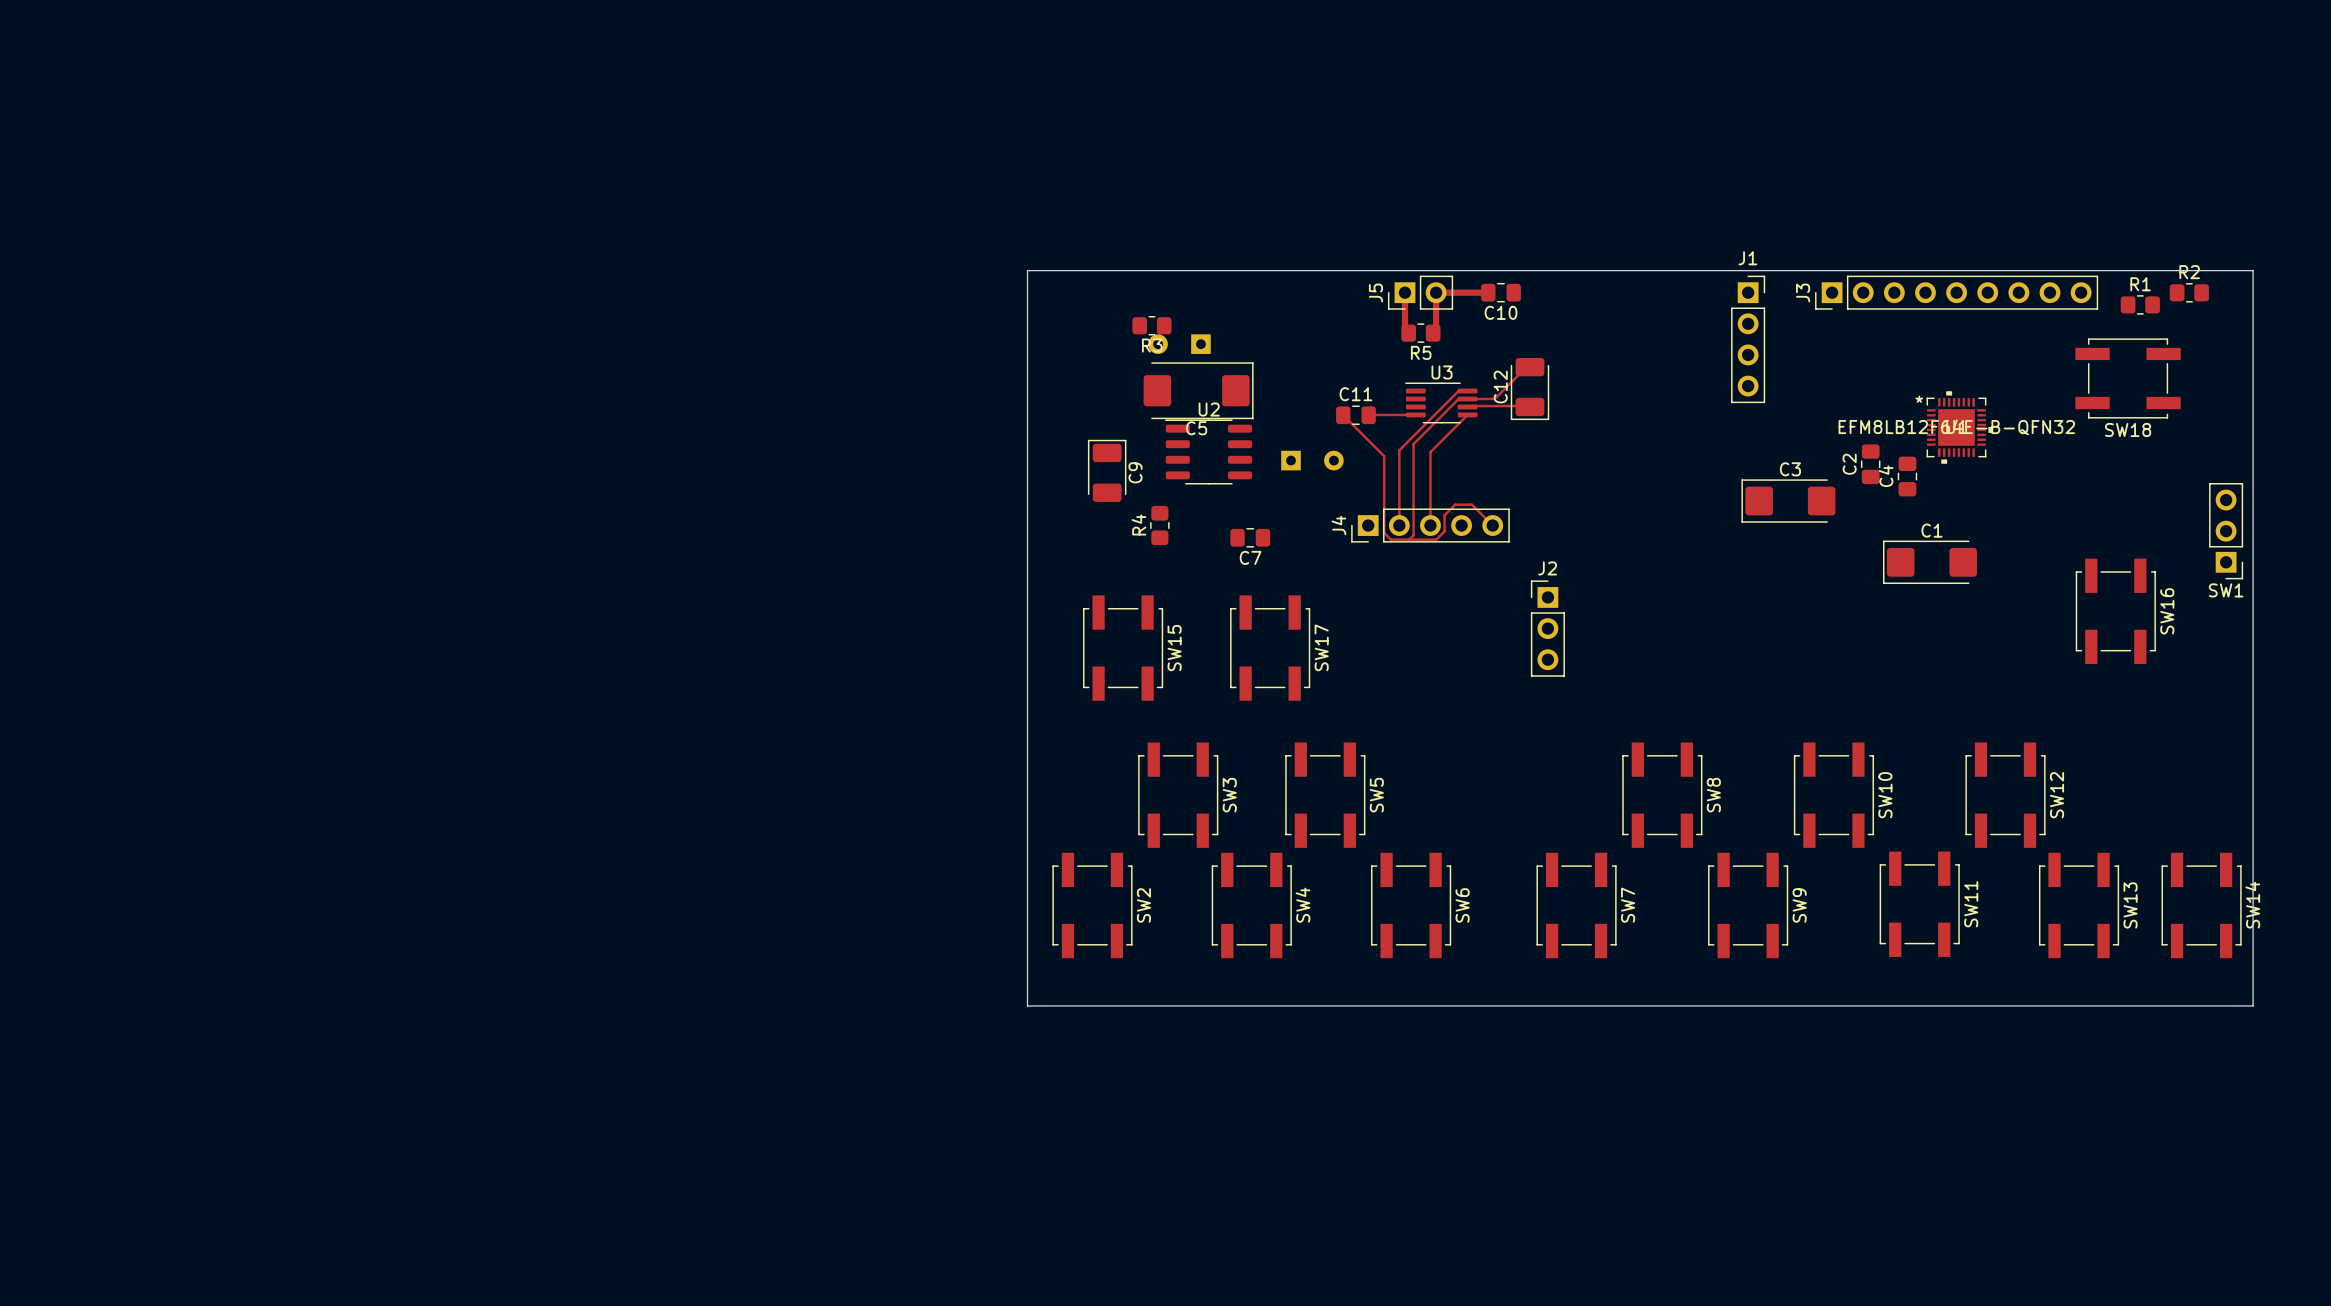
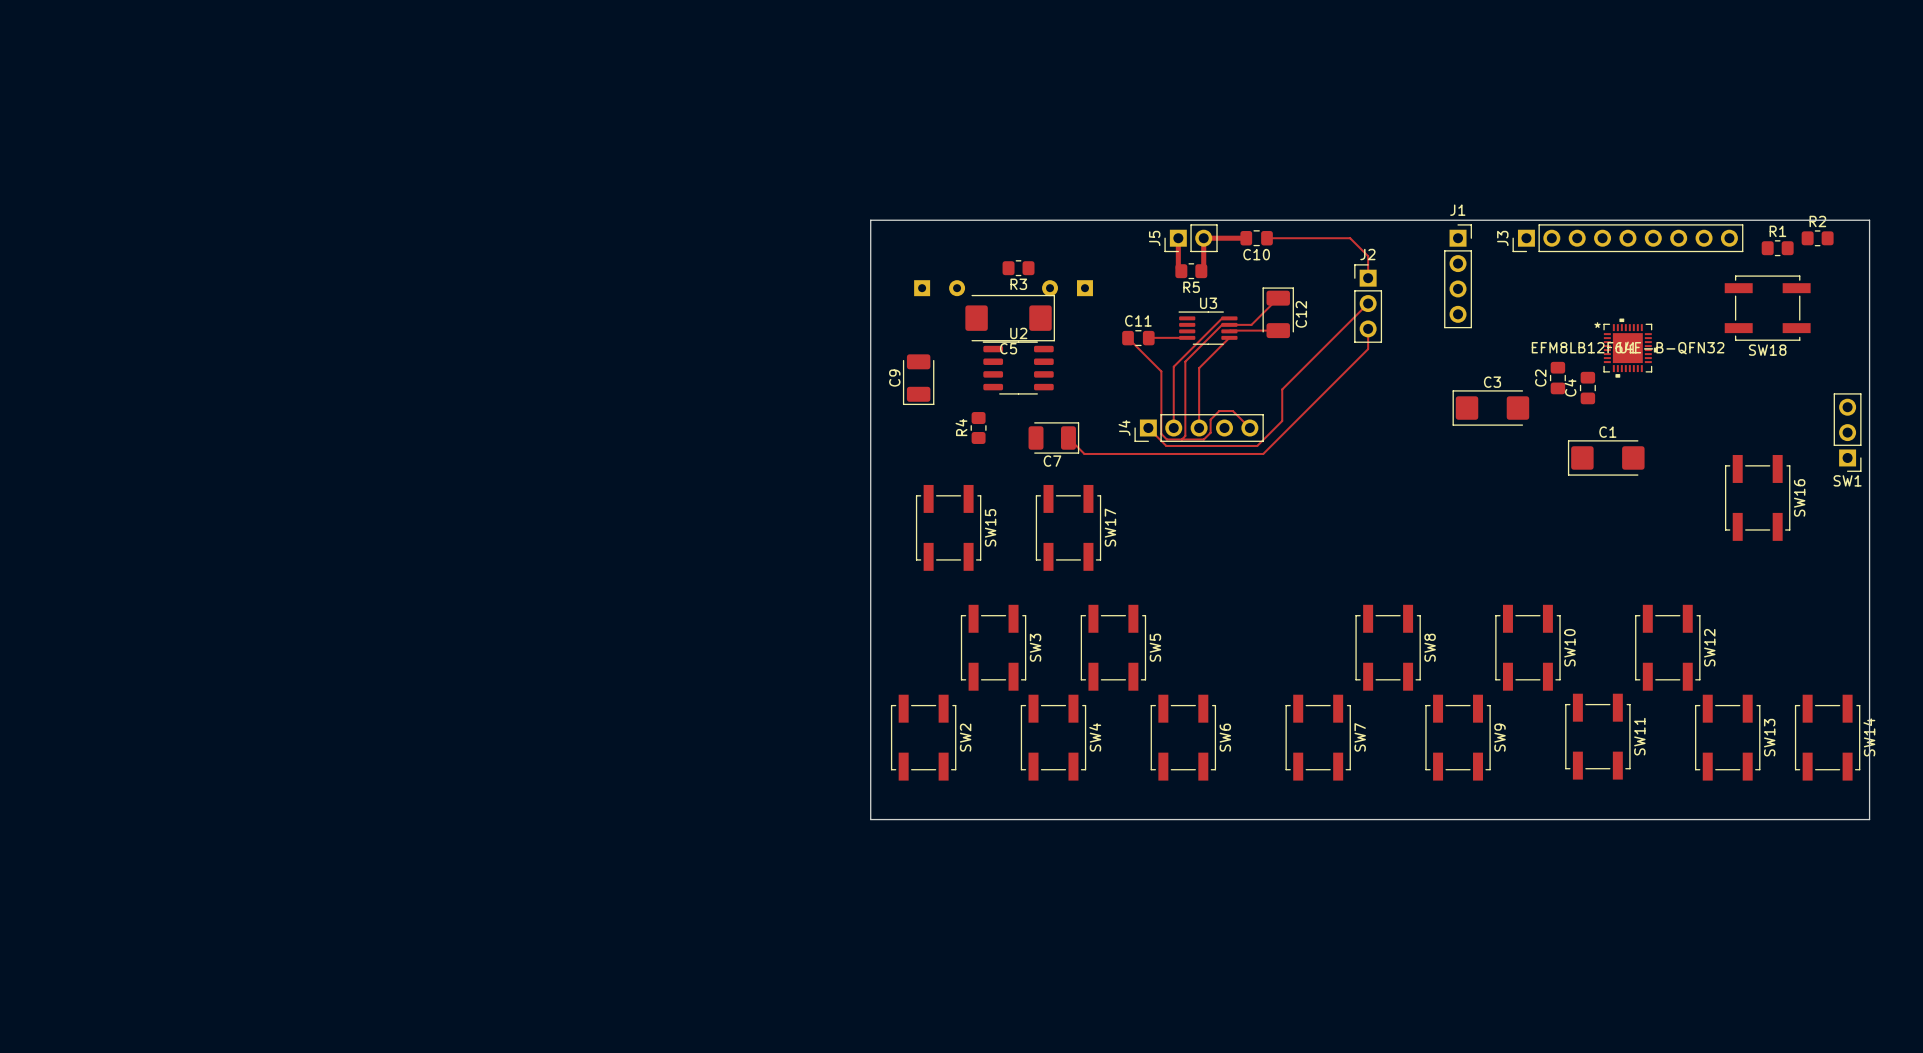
track: none -> (1267, 238) (1350, 238) (1368, 256) (1368, 278)
R3 position: (1151, 325) -> (1018, 268)
part: (1179, 344) -> none
part: none -> (939, 288)
part: none -> (1067, 288)
track: none -> (1368, 303) (1282, 389) (1282, 421) (1257, 445) (1166, 445) (1148, 428)
C12 rotation: 0° (1529, 389) -> 180° (1278, 312)
track: none -> (1368, 328) (1368, 349) (1263, 453) (1084, 453) (1068, 437)
part: (1312, 460) -> none
C9 rotation: 0° (1107, 470) -> 180° (918, 379)
C7 footprint: [1230, 528, 1271, 548] -> [1028, 422, 1080, 454]
J2 position: (1547, 628) -> (1368, 303)

